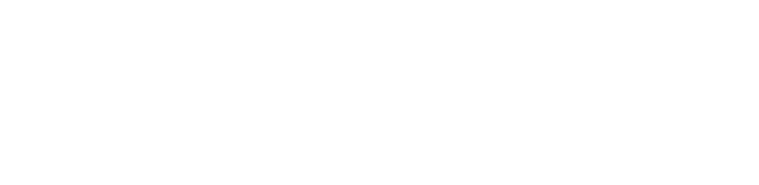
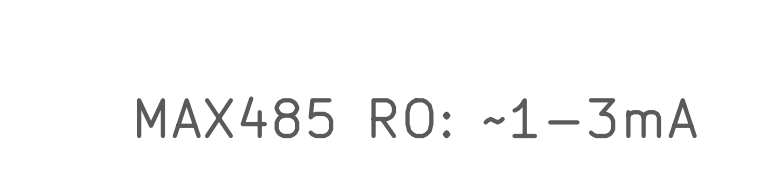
text: none -> MAX485 RO: ~1-3mA (416, 117)

